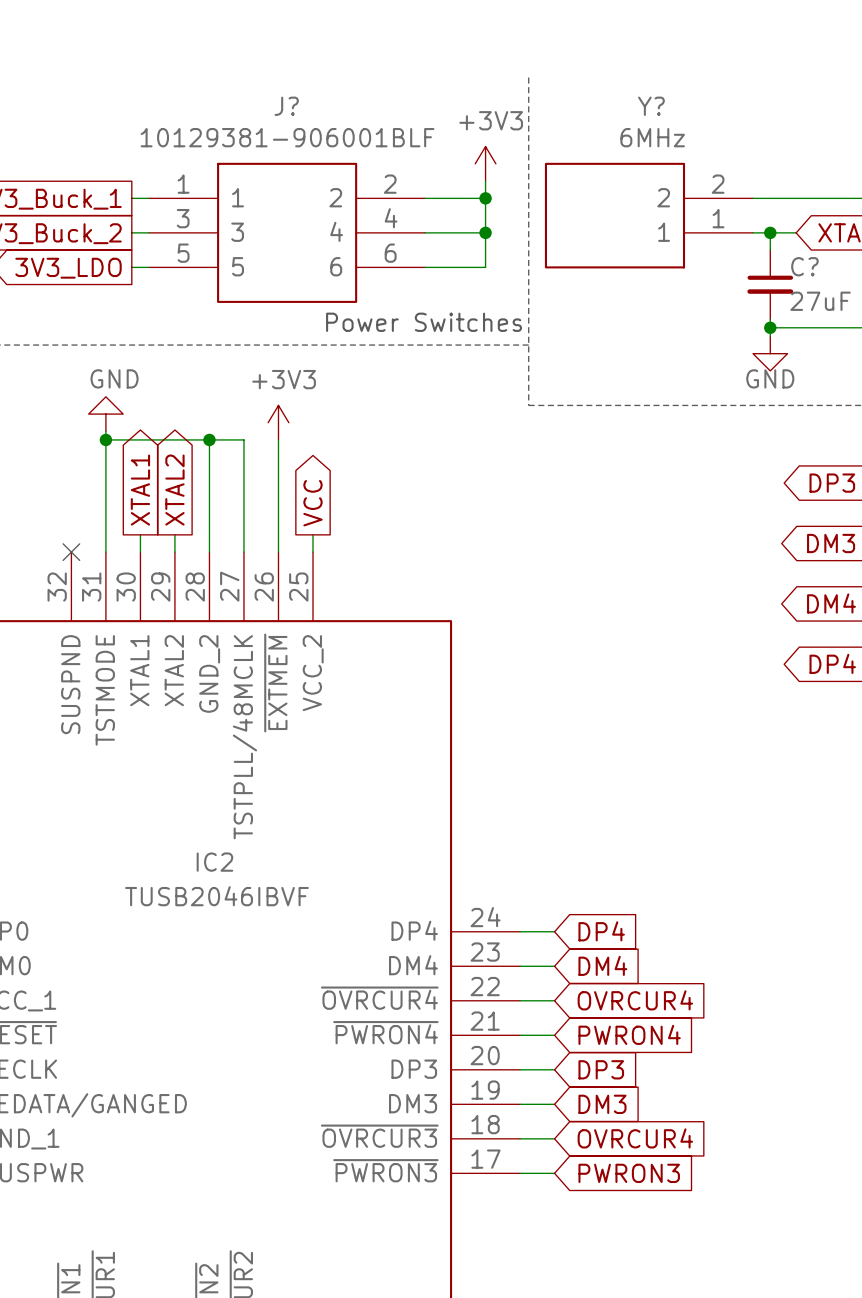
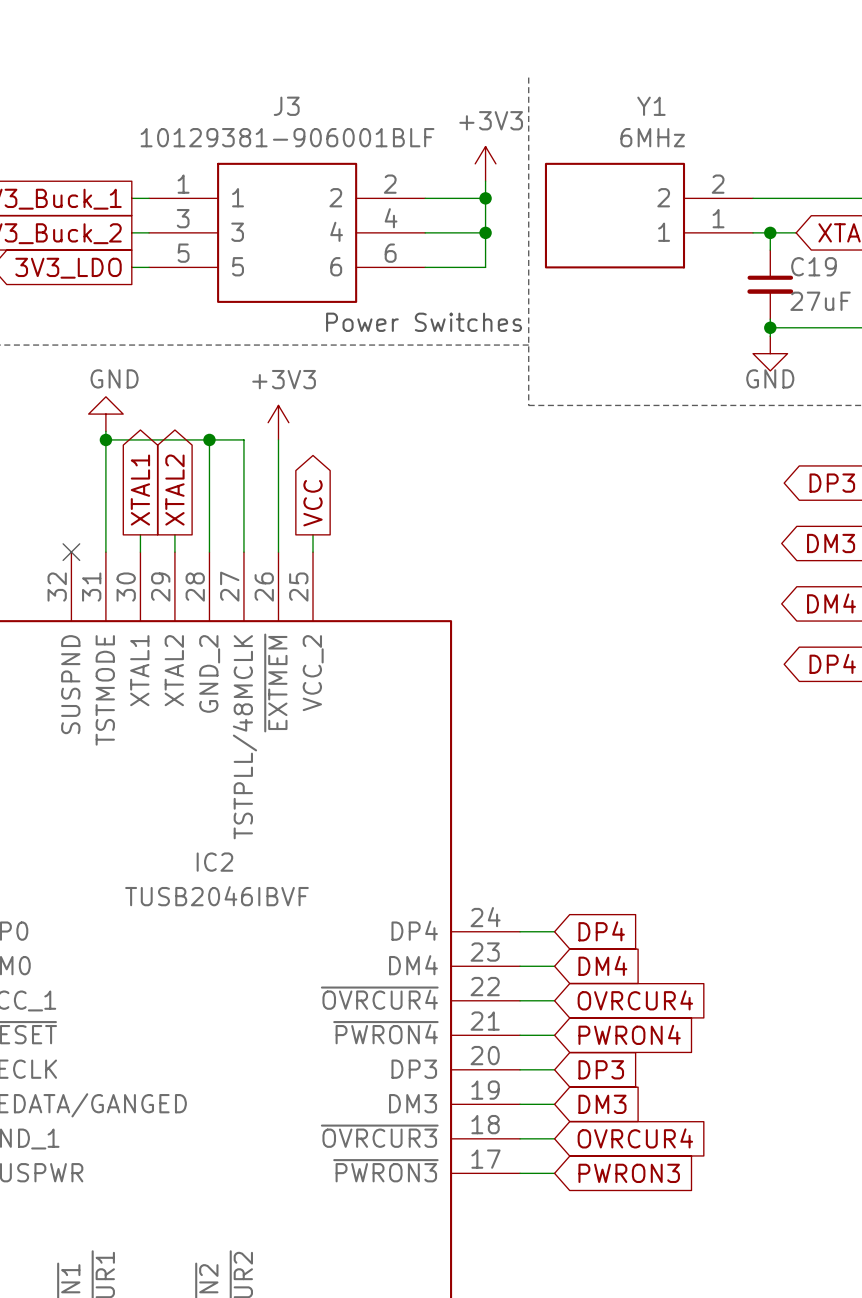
J? name: J? (286, 106) -> J3 (286, 106)
Y? name: Y? (651, 106) -> Y1 (651, 106)
C? name: C? (804, 266) -> C19 (813, 266)

